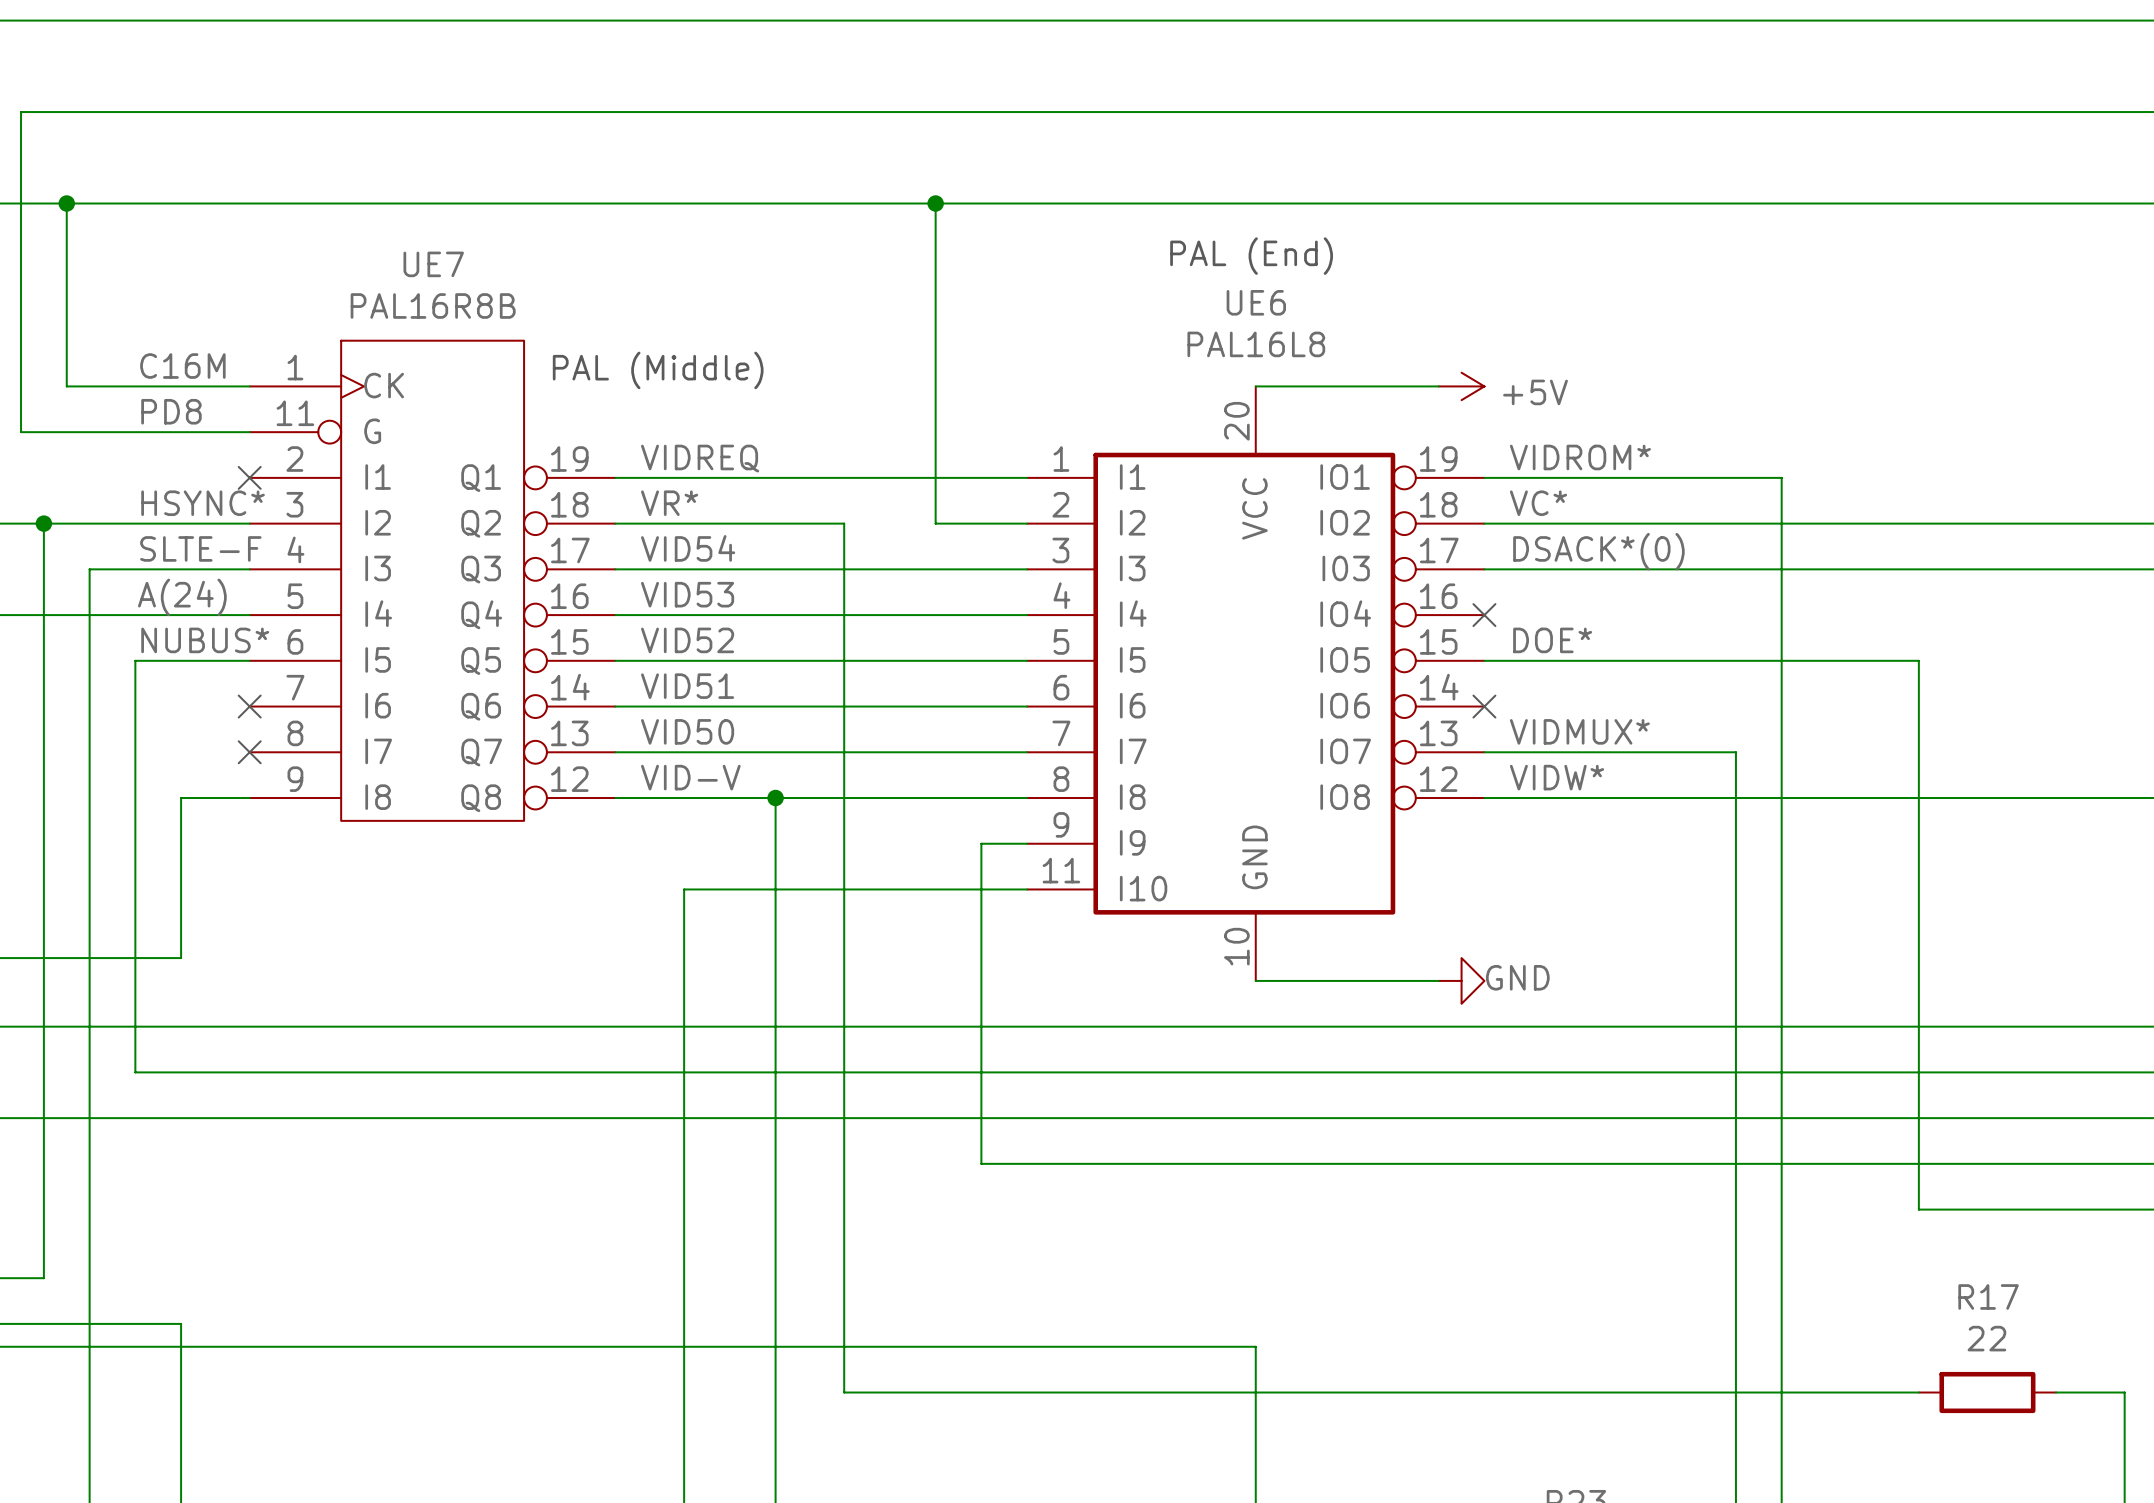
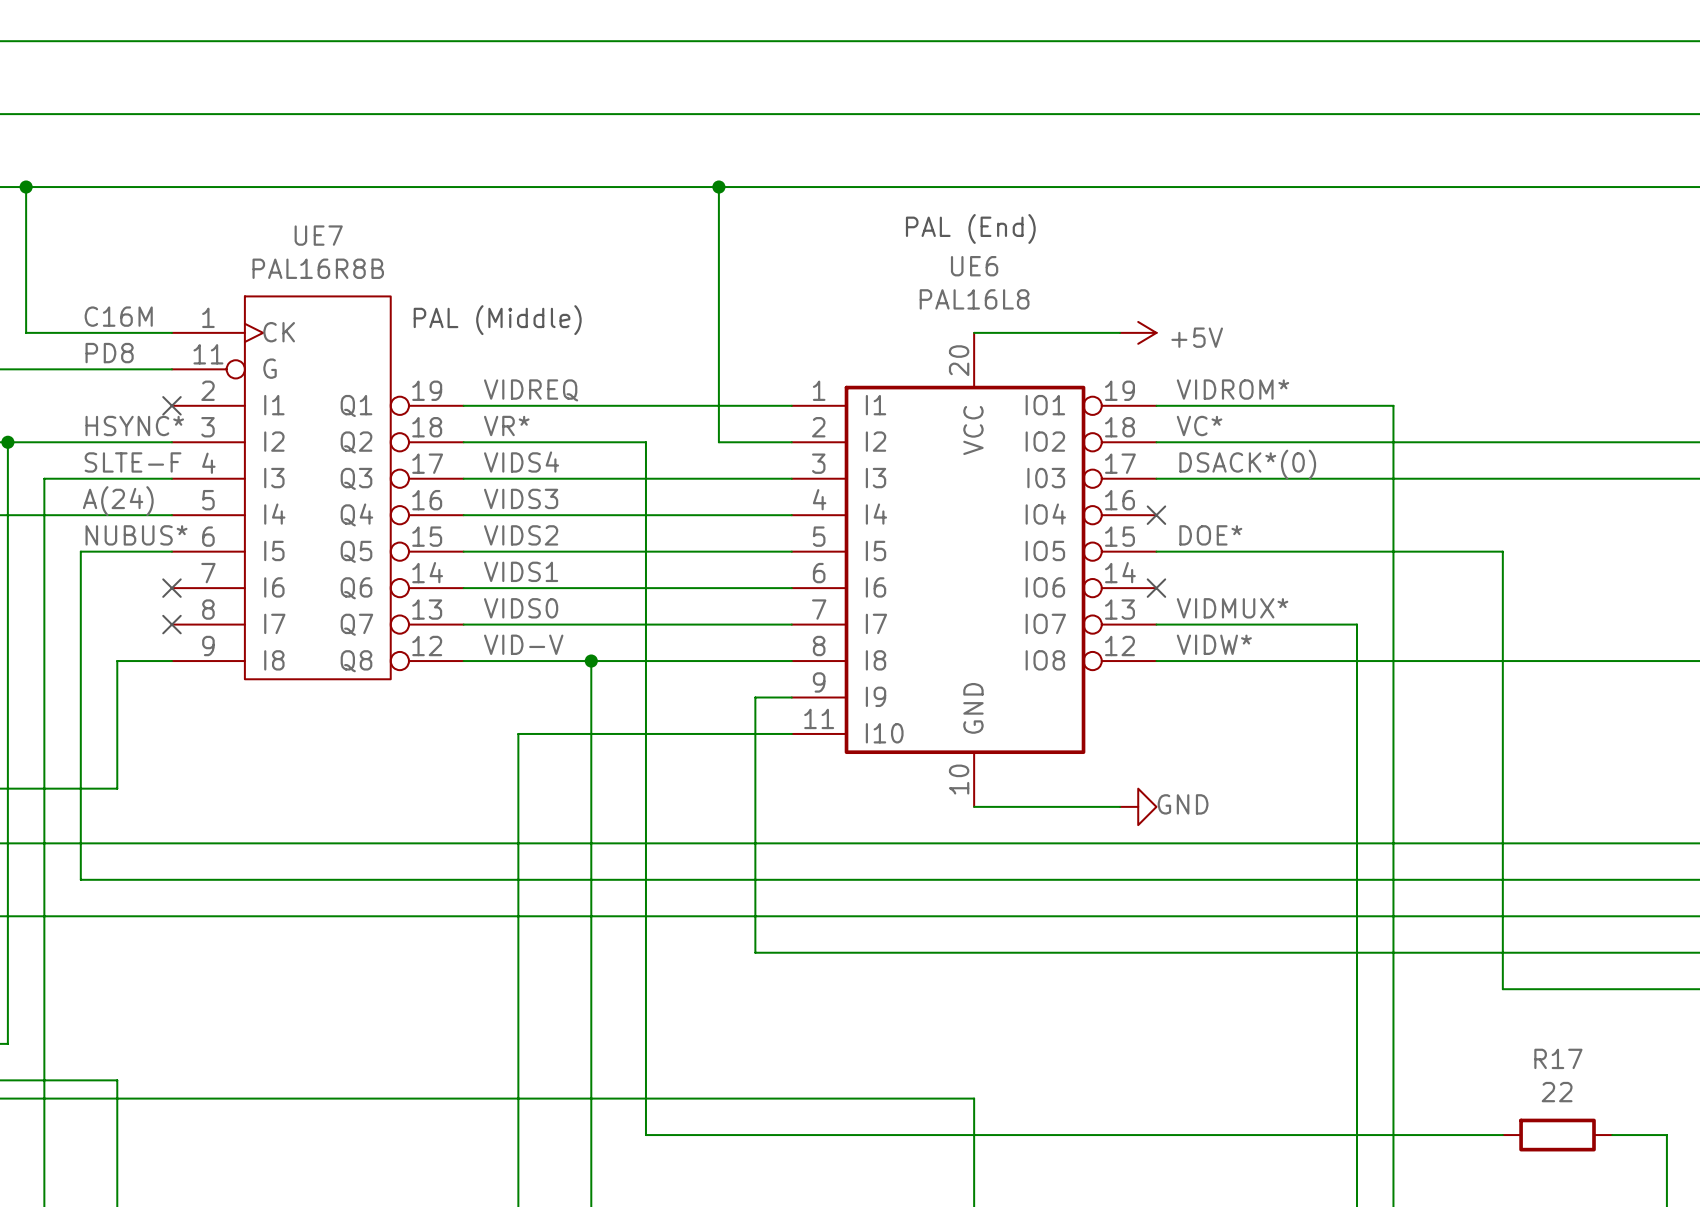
label: VID54 (688, 548) -> VIDS4 (521, 462)
label: VID53 (687, 594) -> VIDS3 (521, 498)
label: VID52 (687, 640) -> VIDS2 (521, 535)
label: VID51 (687, 686) -> VIDS1 (521, 571)
label: VID50 (687, 731) -> VIDS0 (521, 608)

